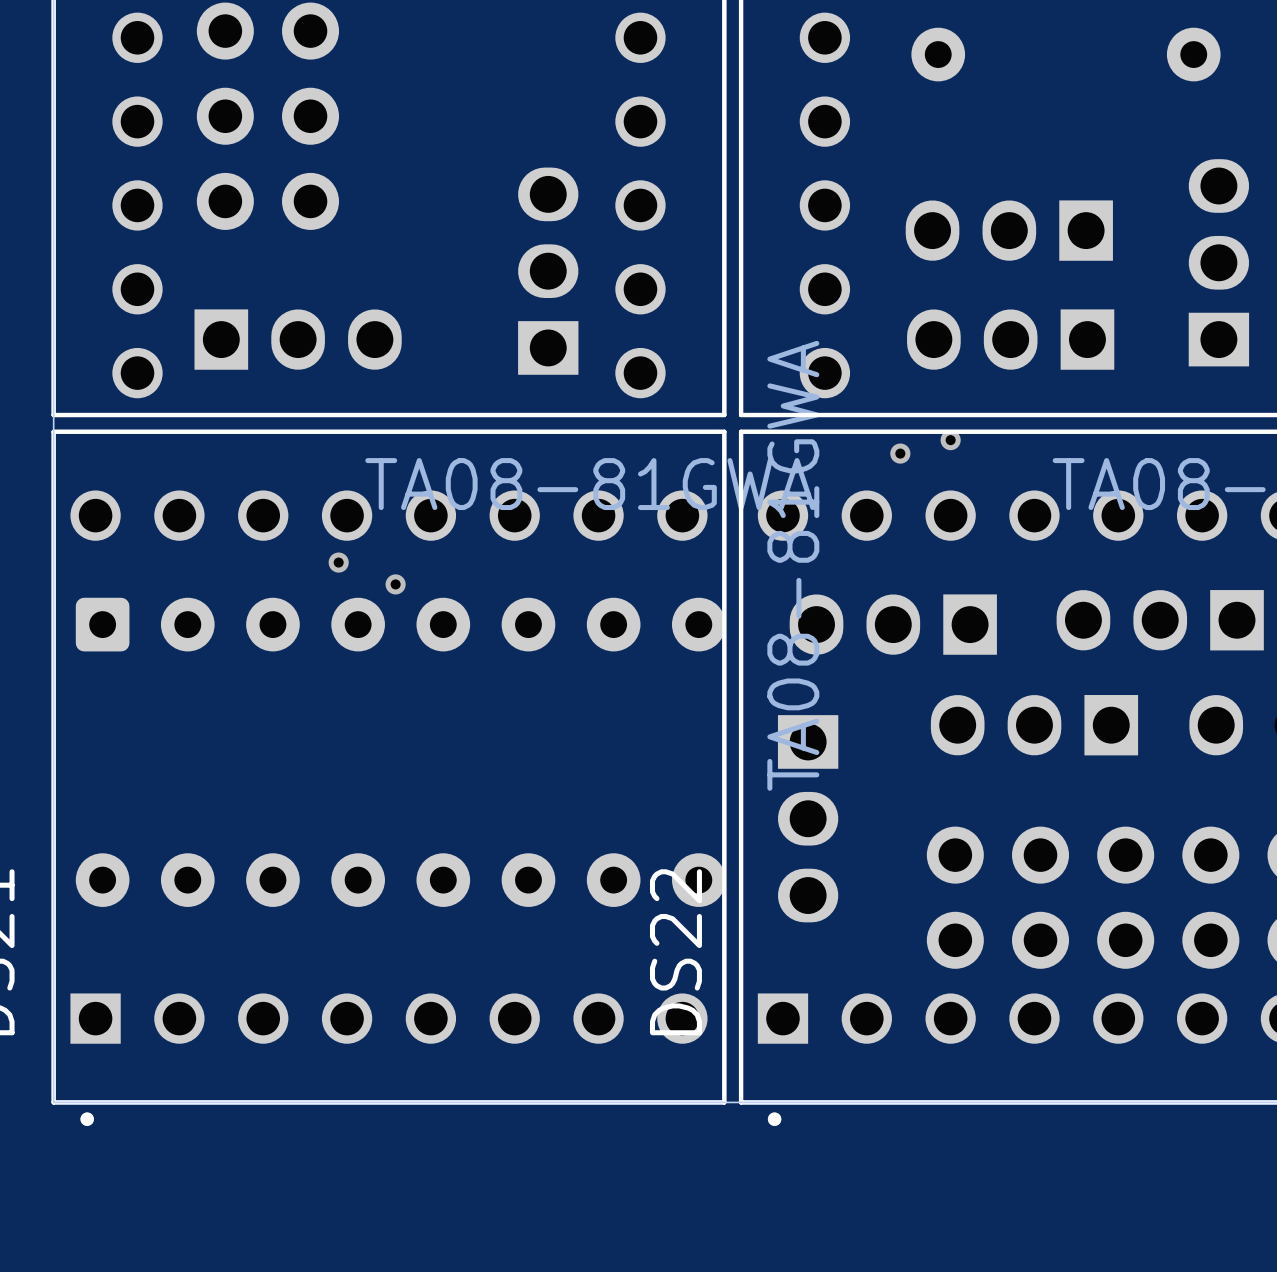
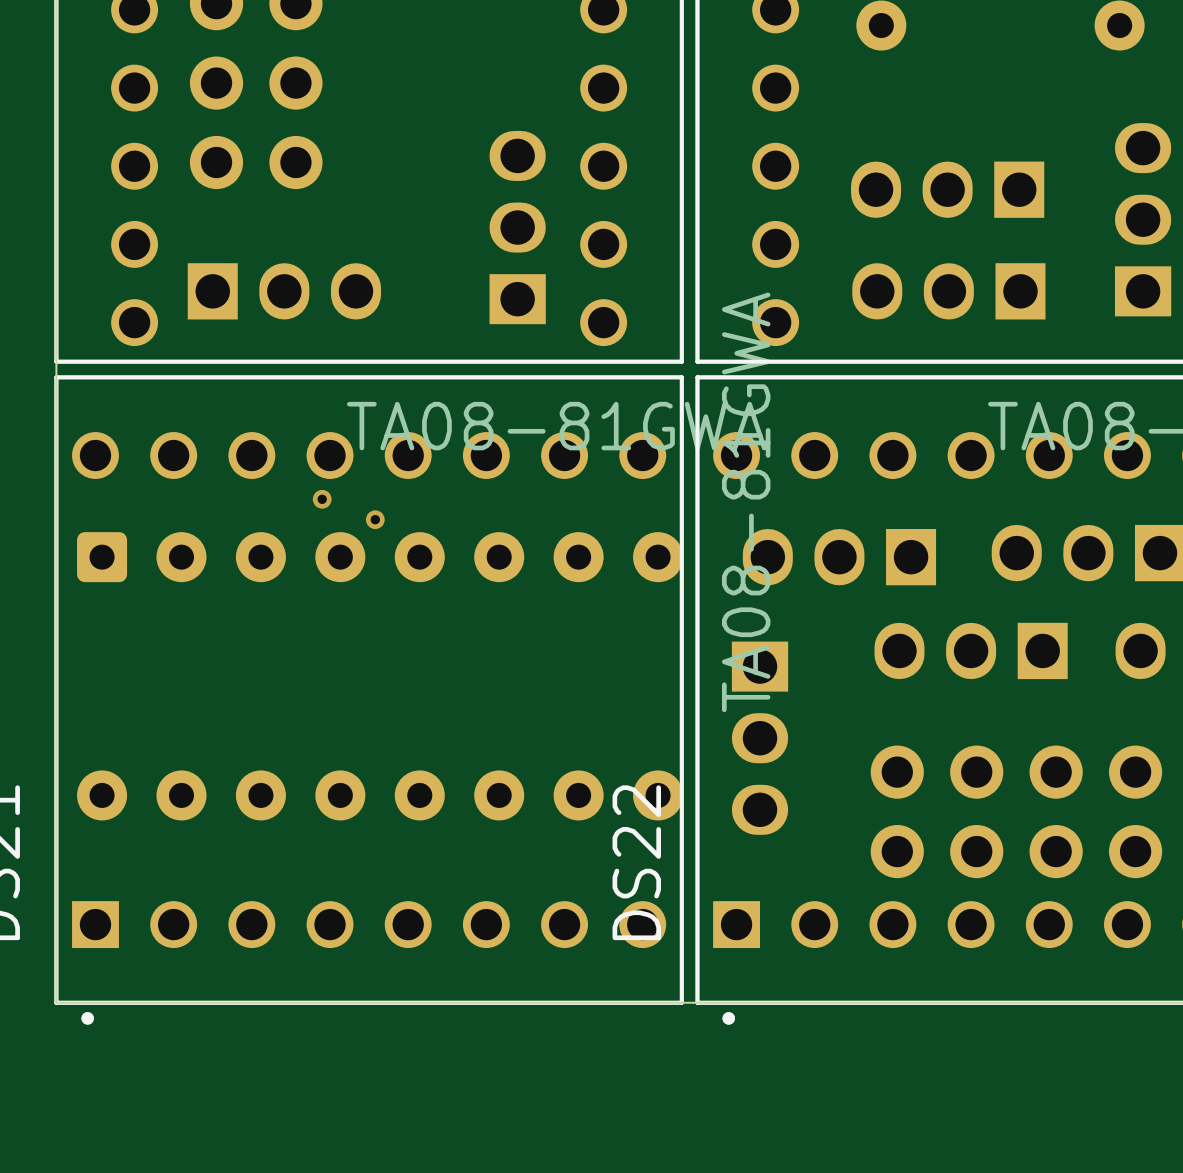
via: (950, 440) -> none
via: (900, 453) -> none

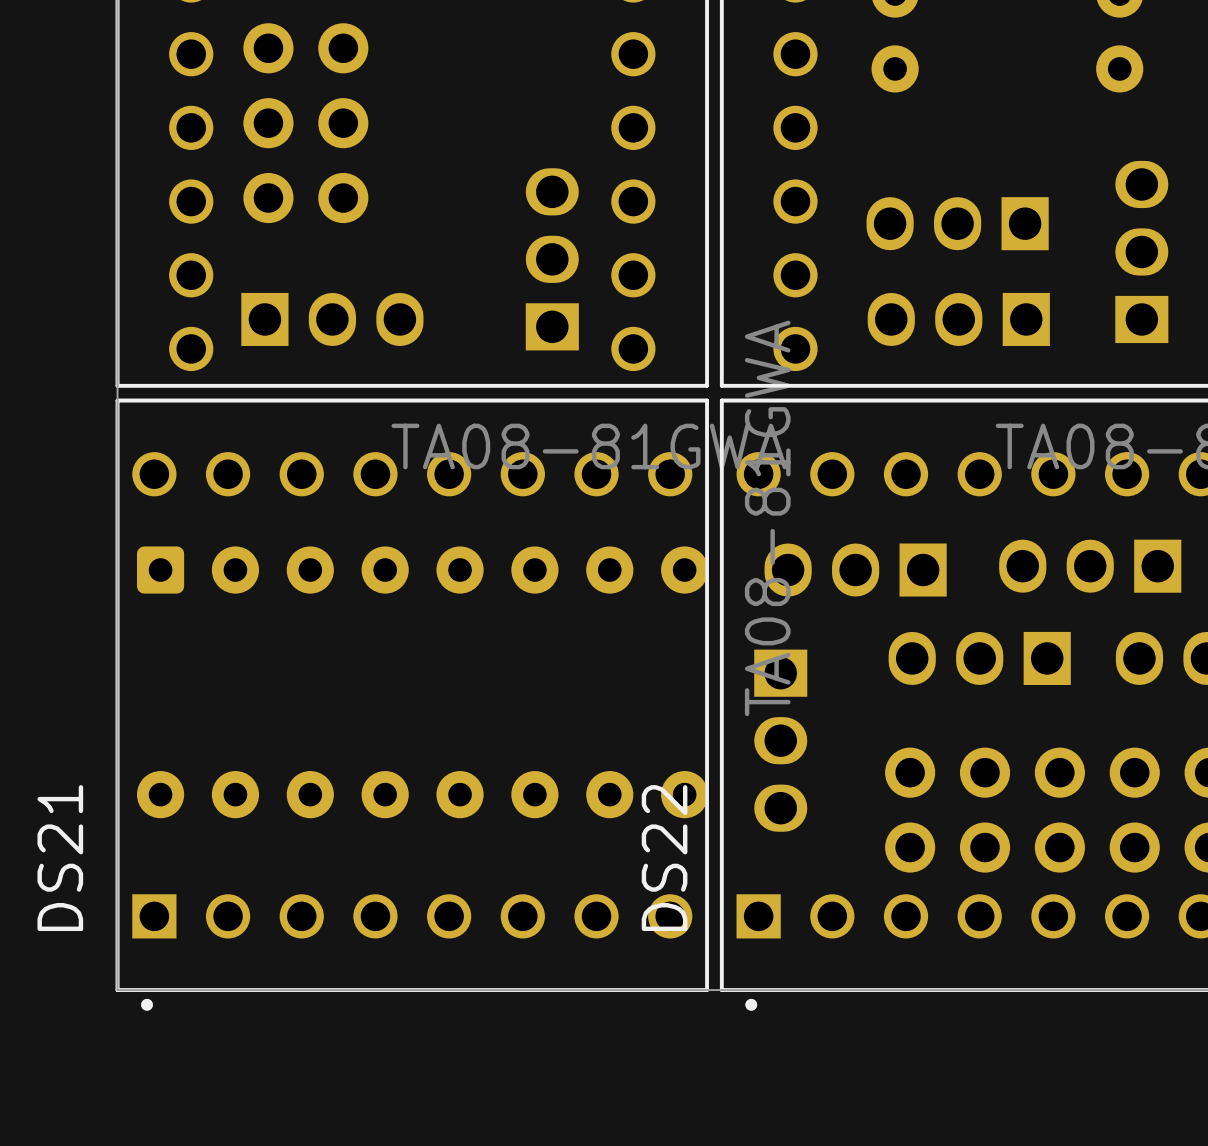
via: (322, 499) -> none
via: (375, 519) -> none

